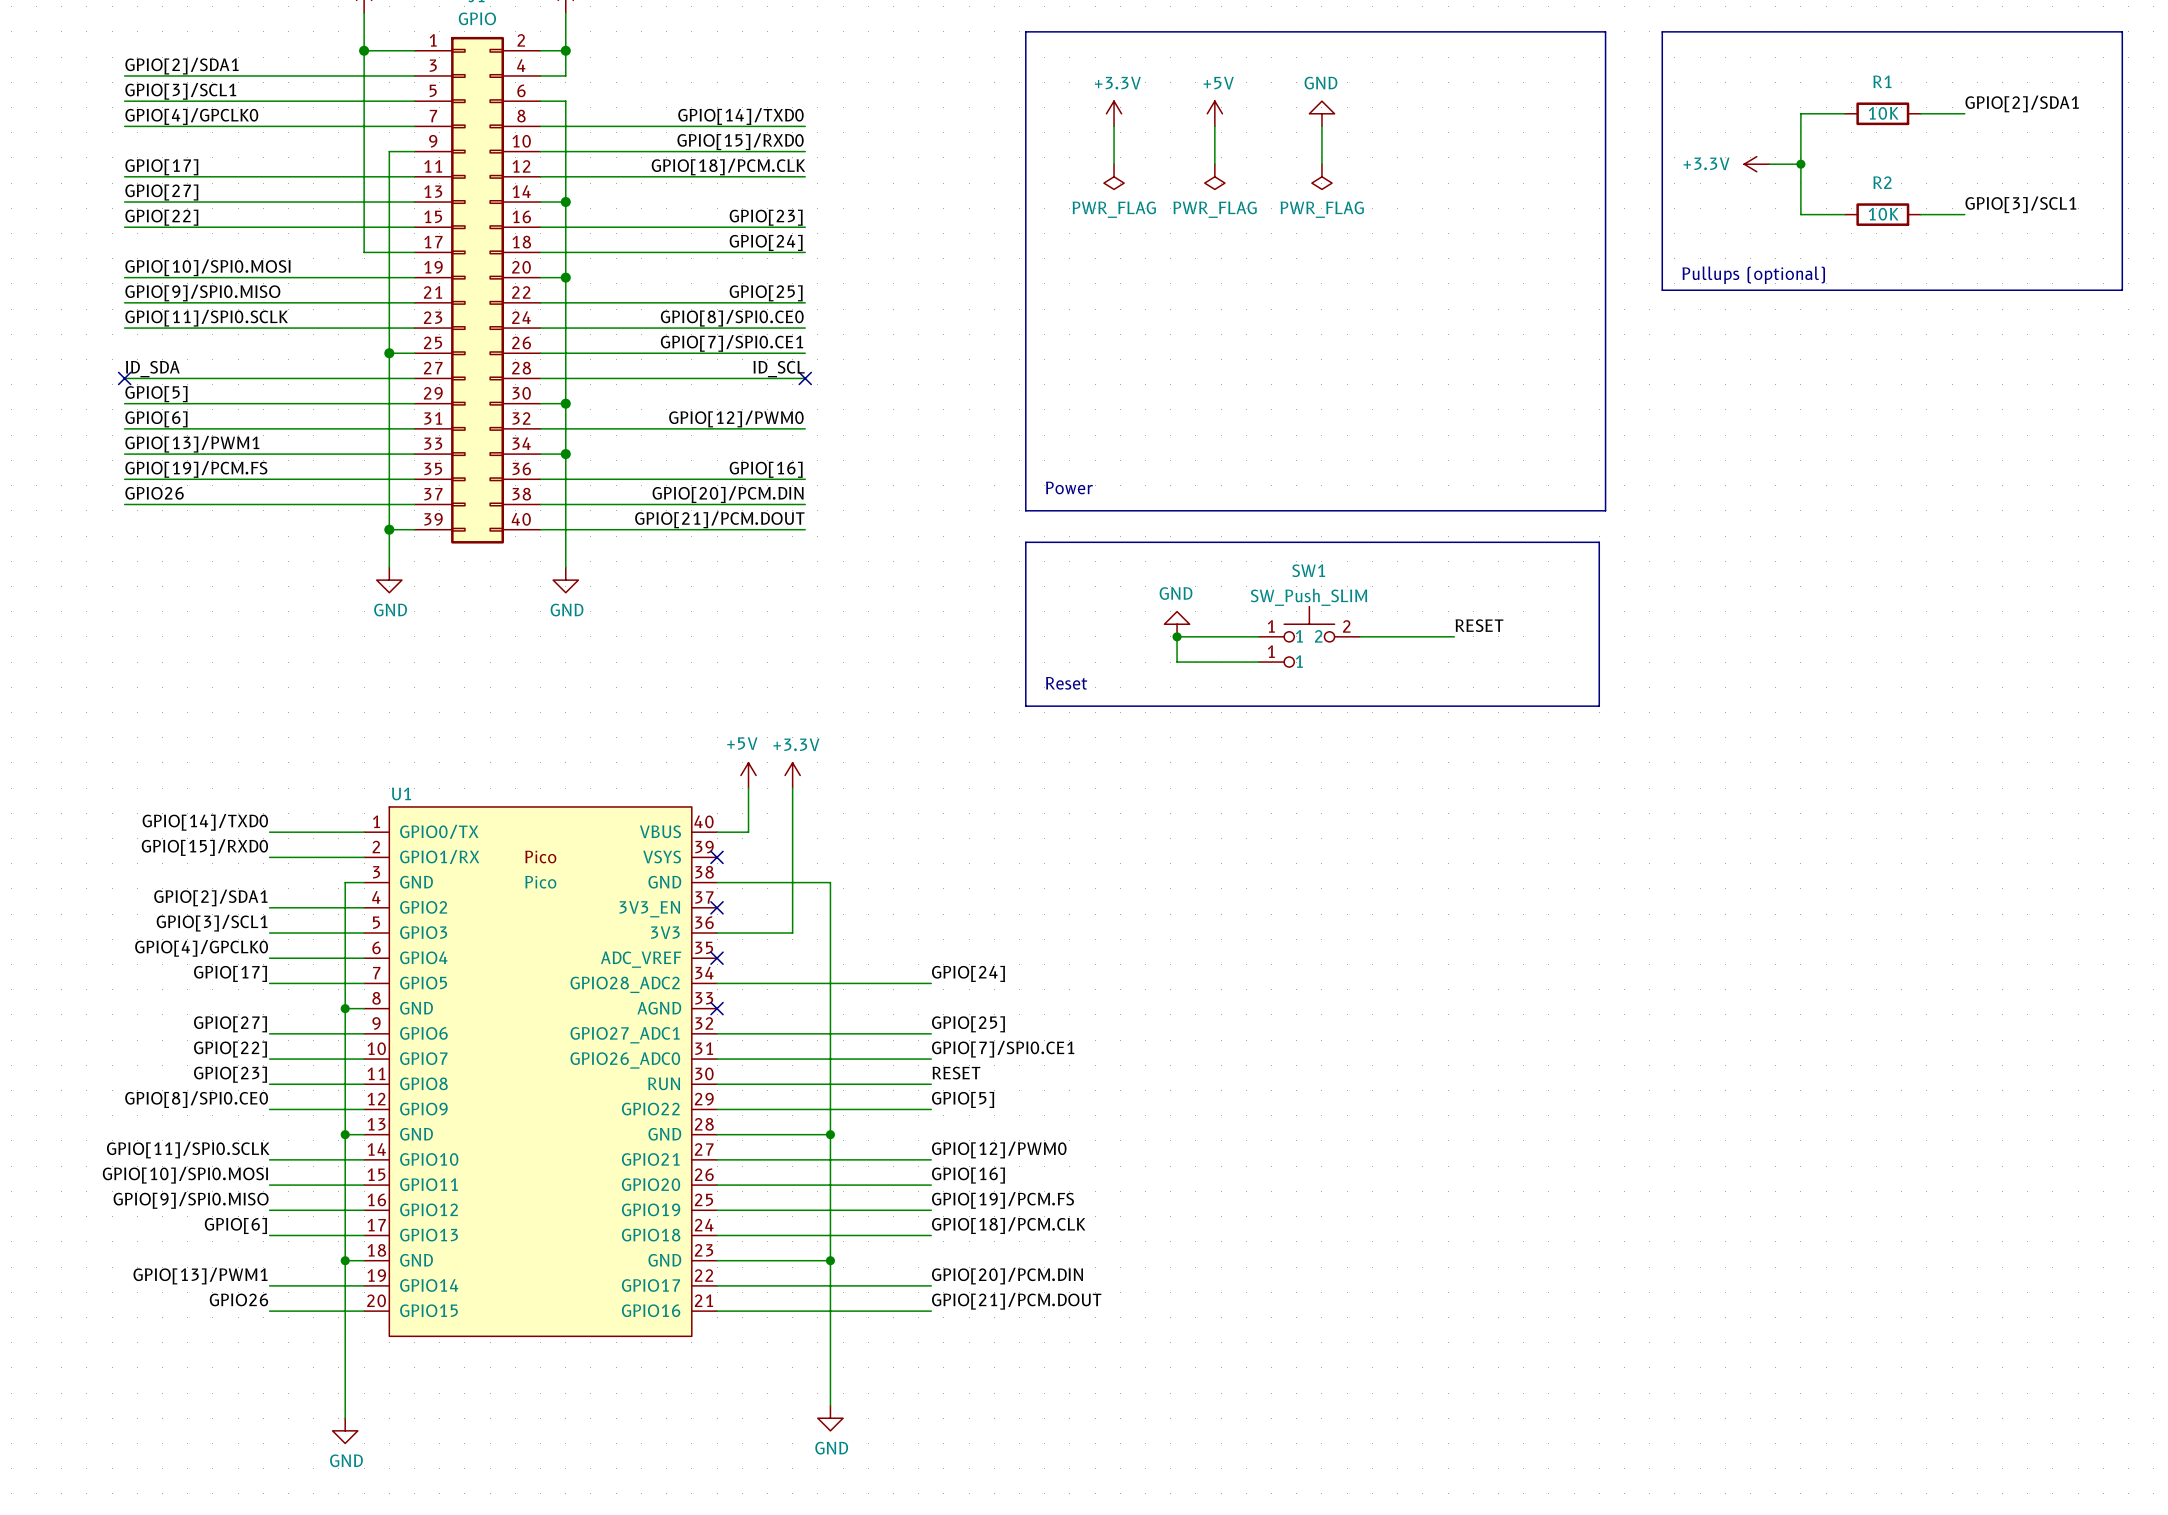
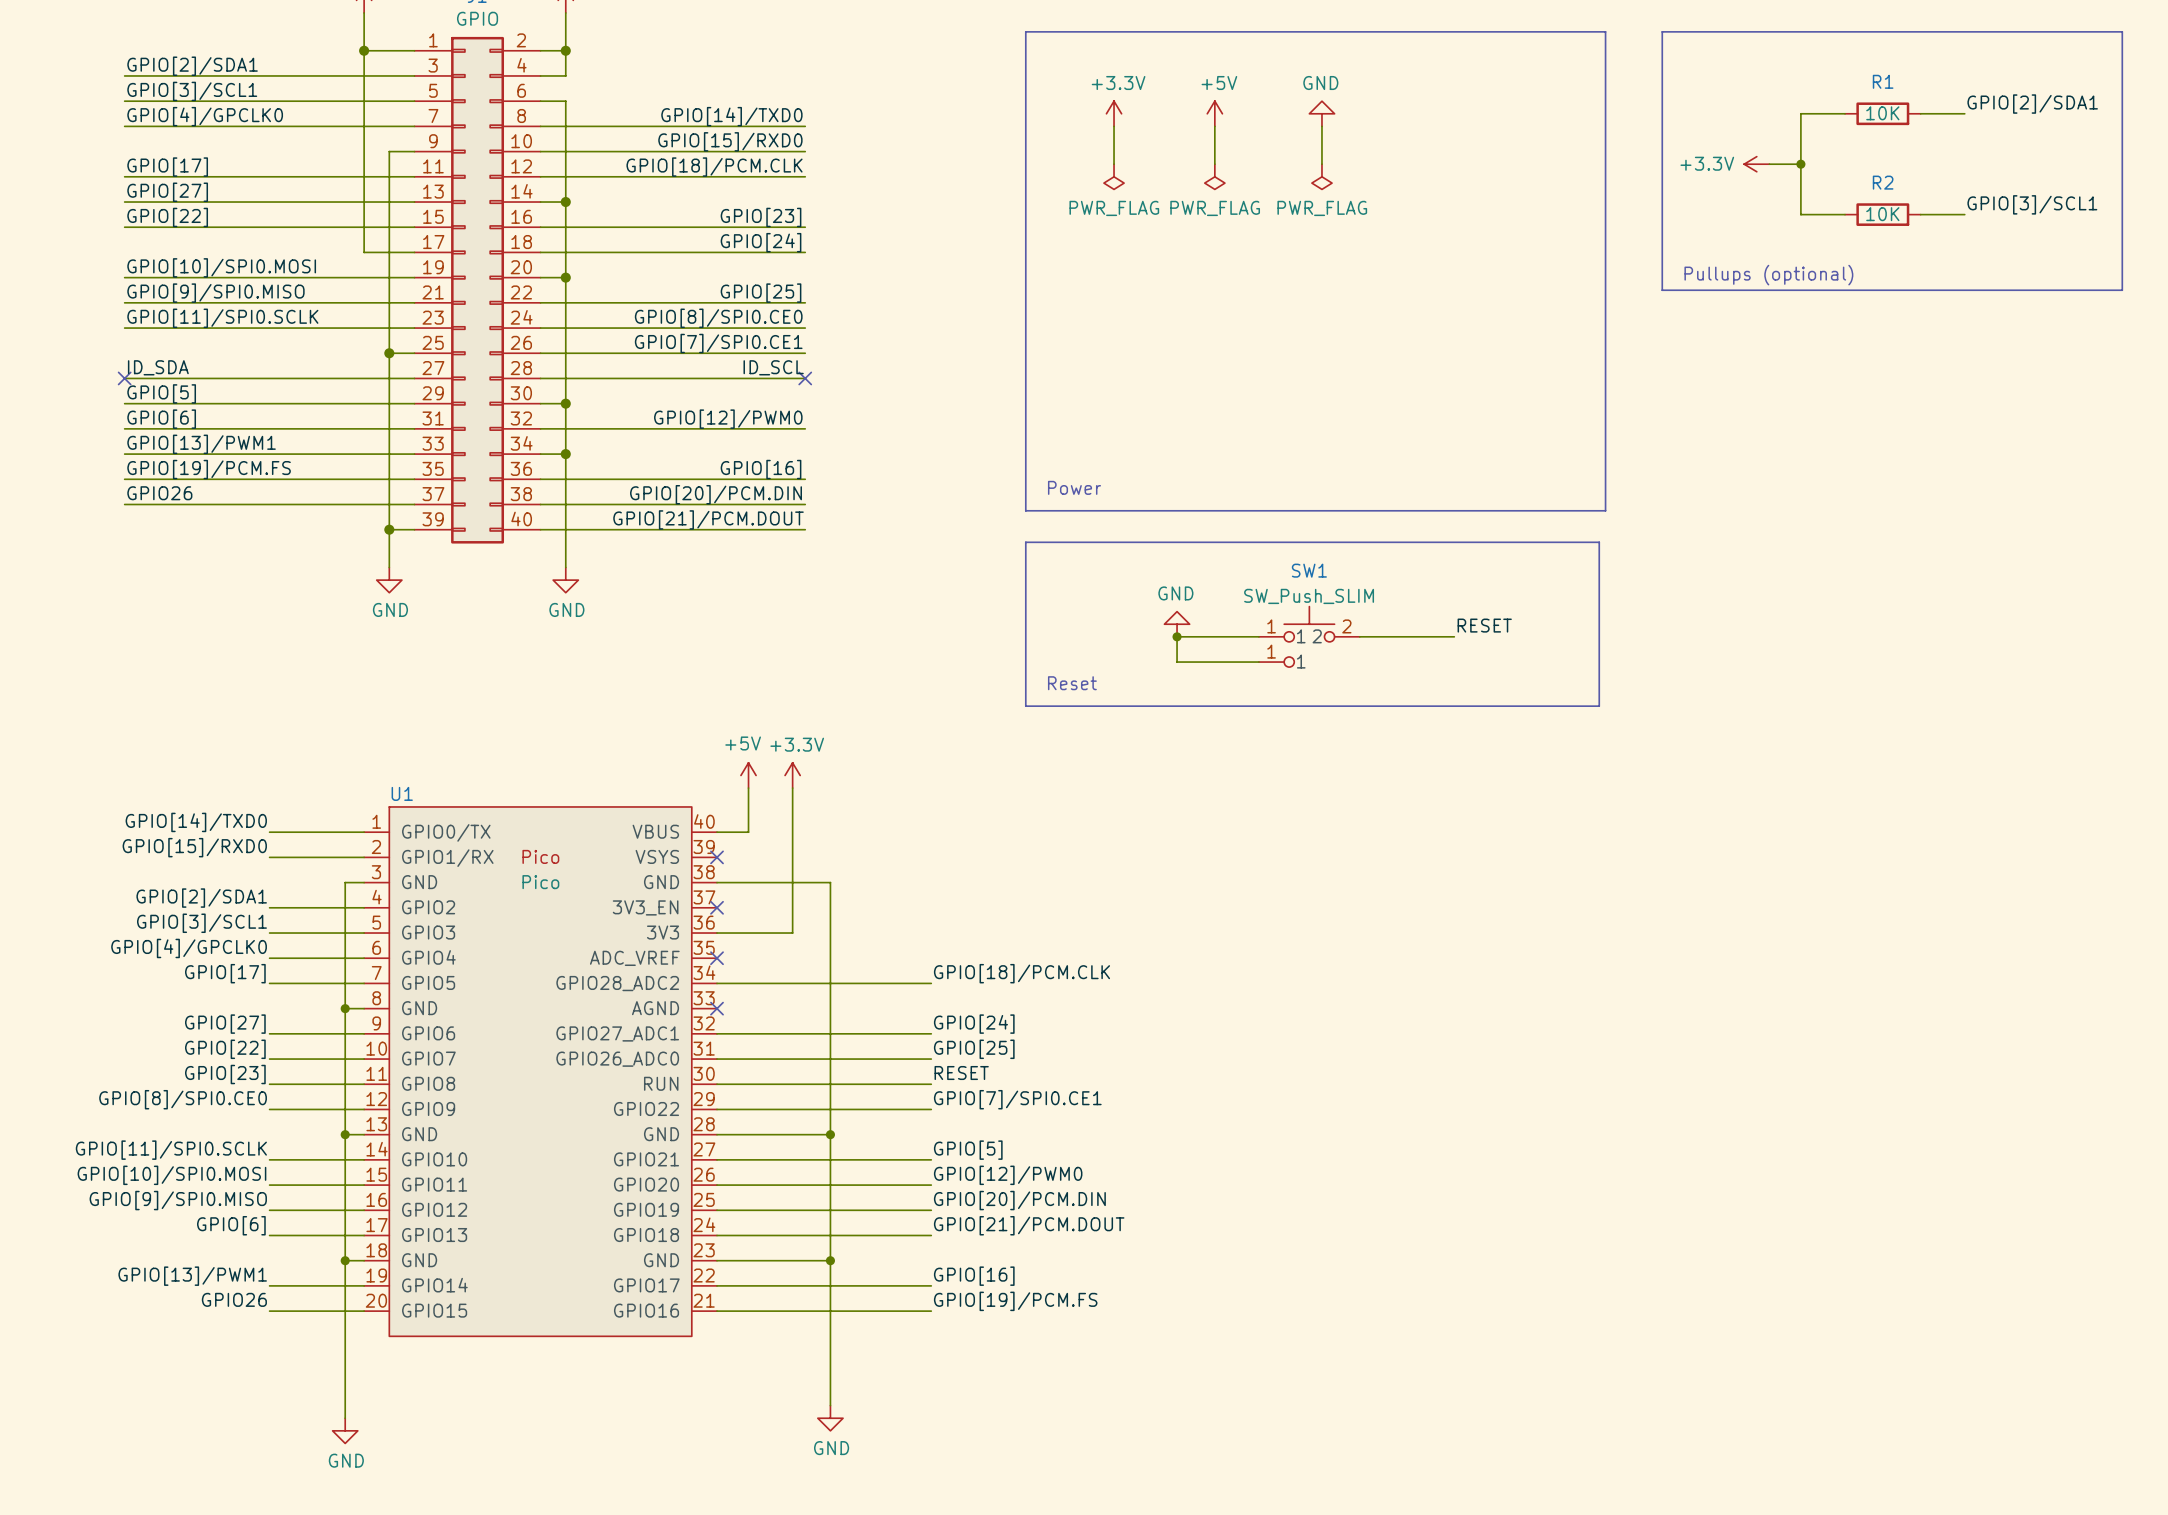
label: GPIO[24] (968, 973) -> GPIO[18]/PCM.CLK (1021, 973)
label: GPIO[25] (968, 1024) -> GPIO[24] (974, 1024)
label: GPIO[7]/SPI0.CE1 (1003, 1049) -> GPIO[25] (974, 1049)
label: GPIO[5] (963, 1099) -> GPIO[7]/SPI0.CE1 (1017, 1099)
label: GPIO[12]/PWM0 (999, 1150) -> GPIO[5] (968, 1150)
label: GPIO[16] (968, 1175) -> GPIO[12]/PWM0 (1008, 1175)
label: GPIO[19]/PCM.FS (1002, 1200) -> GPIO[20]/PCM.DIN (1019, 1200)
label: GPIO[18]/PCM.CLK (1008, 1225) -> GPIO[21]/PCM.DOUT (1029, 1225)
label: GPIO[20]/PCM.DIN (1007, 1276) -> GPIO[16] (974, 1276)
label: GPIO[21]/PCM.DOUT (1016, 1301) -> GPIO[19]/PCM.FS (1015, 1301)

